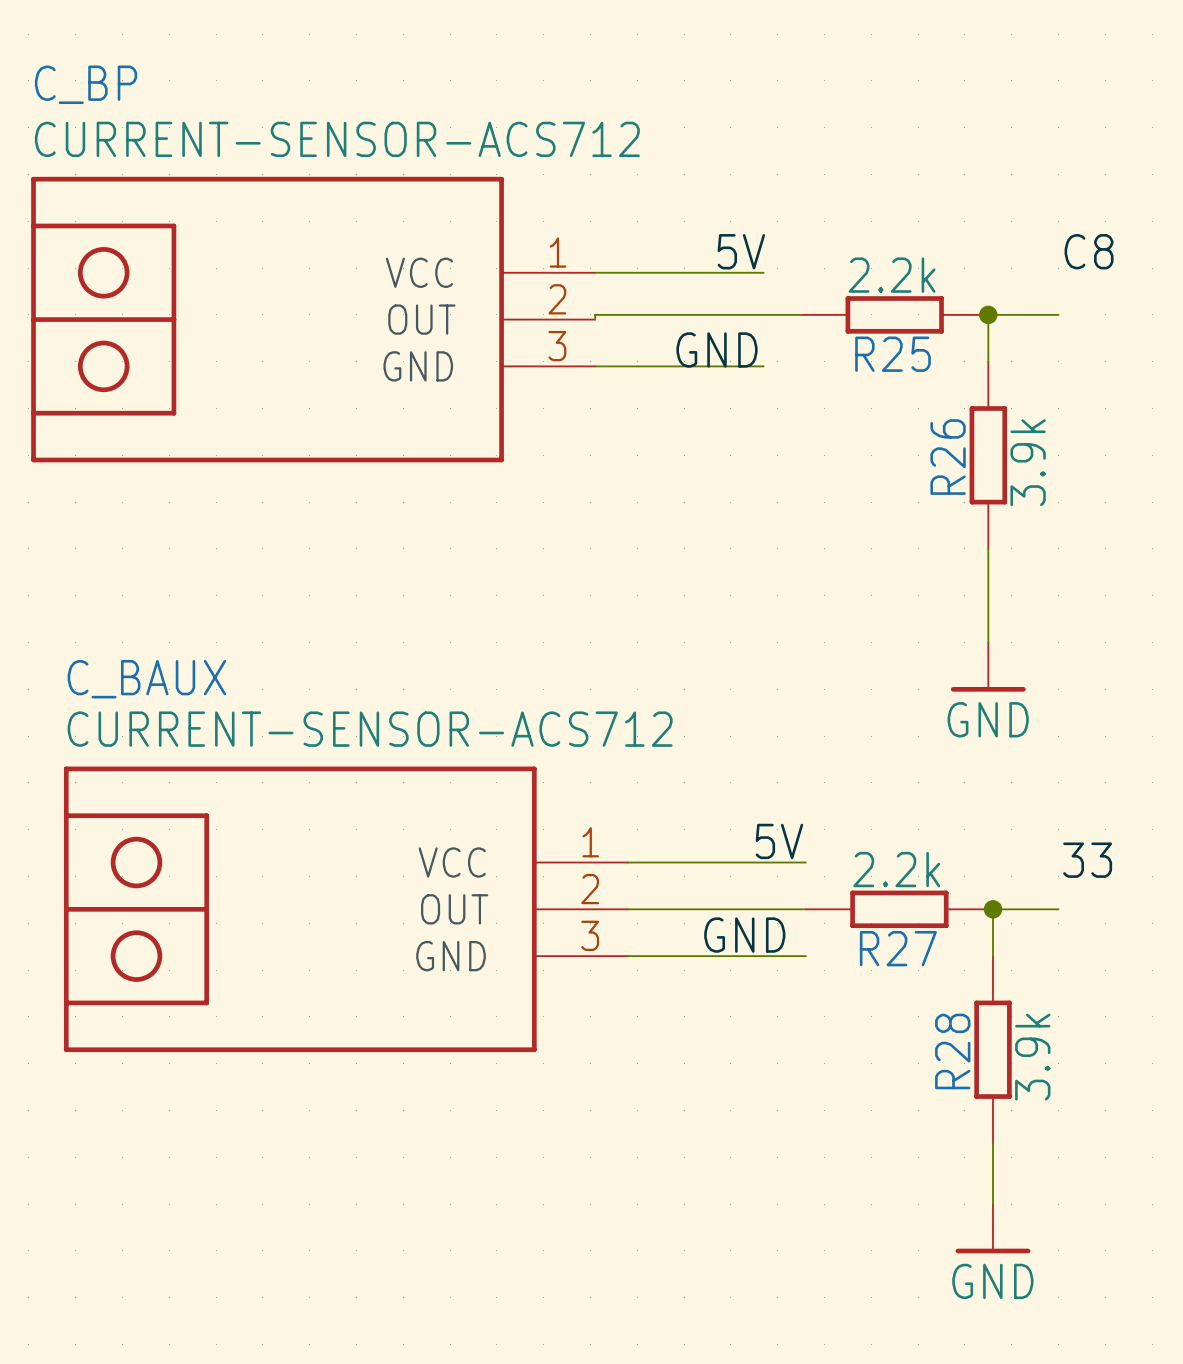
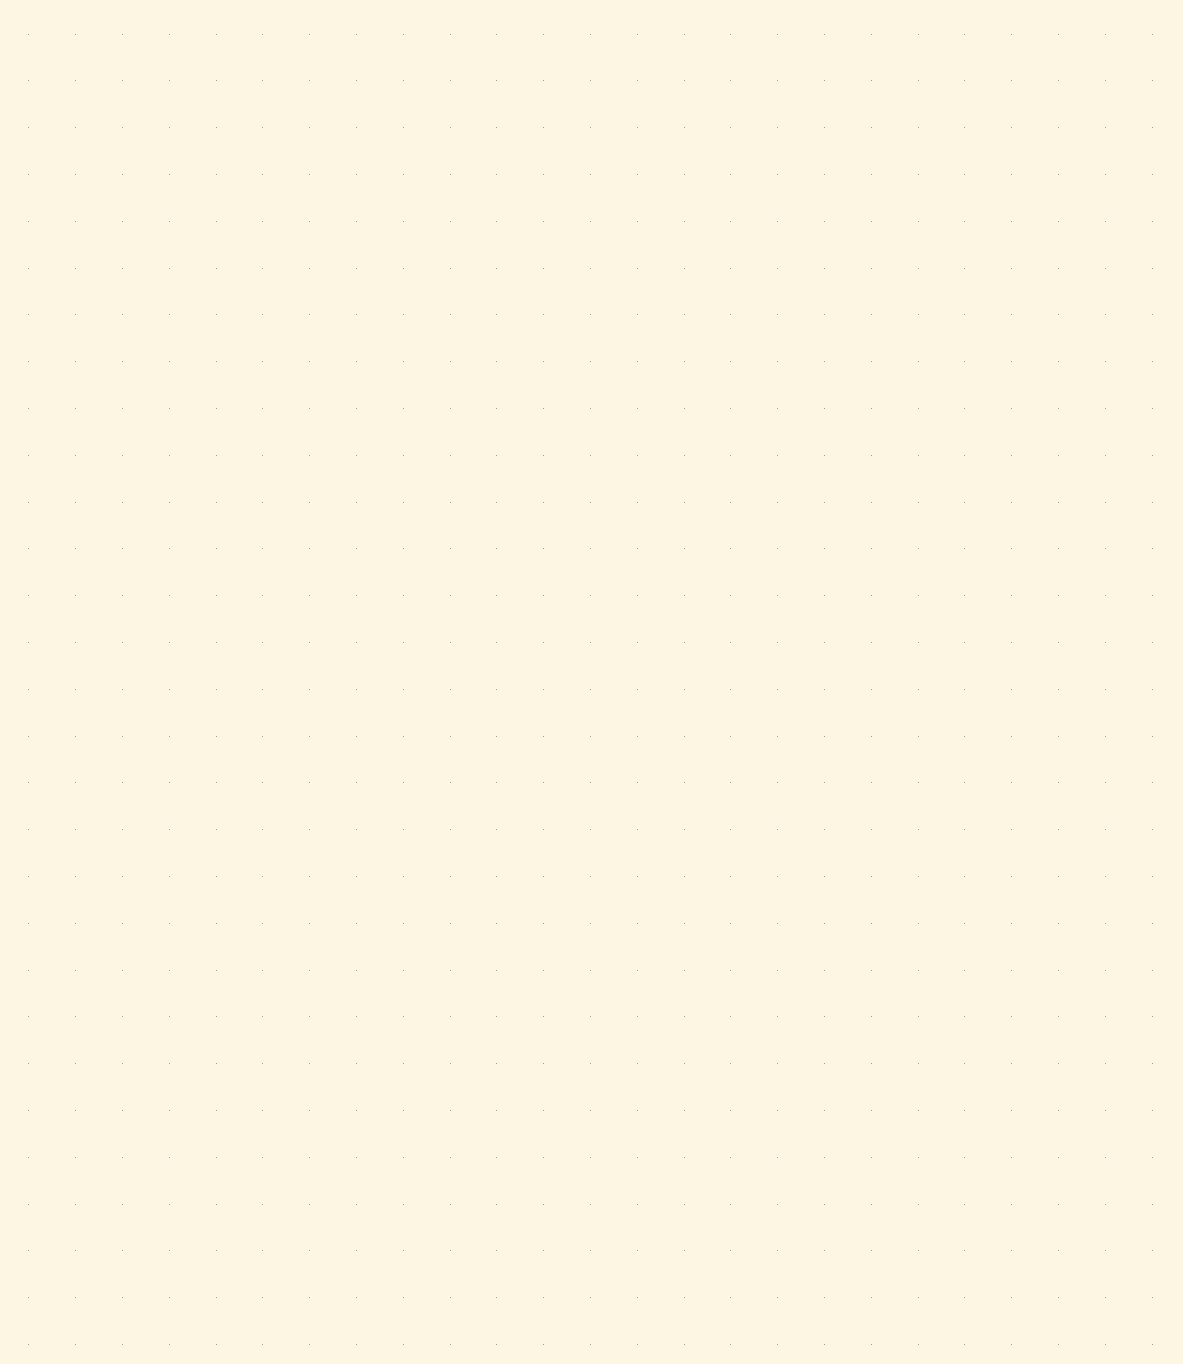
label: 5V (741, 251) -> none
label: C8 (1089, 251) -> none
wire: (595, 272) (763, 272) -> none
wire: (801, 314) (595, 314) (595, 319) -> none
R25: 2.2k (894, 314) -> none
junction: (988, 314) -> none
wire: (1058, 314) (988, 314) (988, 361) -> none
C_BP: CURRENT-SENSOR-ACS712 (313, 319) -> none
label: GND (717, 350) -> none
wire: (595, 366) (763, 366) -> none
R26: 3.9k (988, 455) -> none
wire: (988, 548) (988, 642) -> none
power symbol: GND (988, 667) -> none
label: 5V (779, 841) -> none
label: 33 (1087, 860) -> none
wire: (627, 862) (805, 862) -> none
C_BAUX: CURRENT-SENSOR-ACS712 (345, 909) -> none
wire: (627, 909) (805, 909) -> none
R27: 2.2k (899, 909) -> none
junction: (993, 909) -> none
wire: (1058, 909) (993, 909) (993, 956) -> none
label: GND (744, 935) -> none
wire: (627, 956) (805, 956) -> none
R28: 3.9k (993, 1049) -> none
wire: (993, 1143) (993, 1204) -> none
power symbol: GND (993, 1228) -> none

